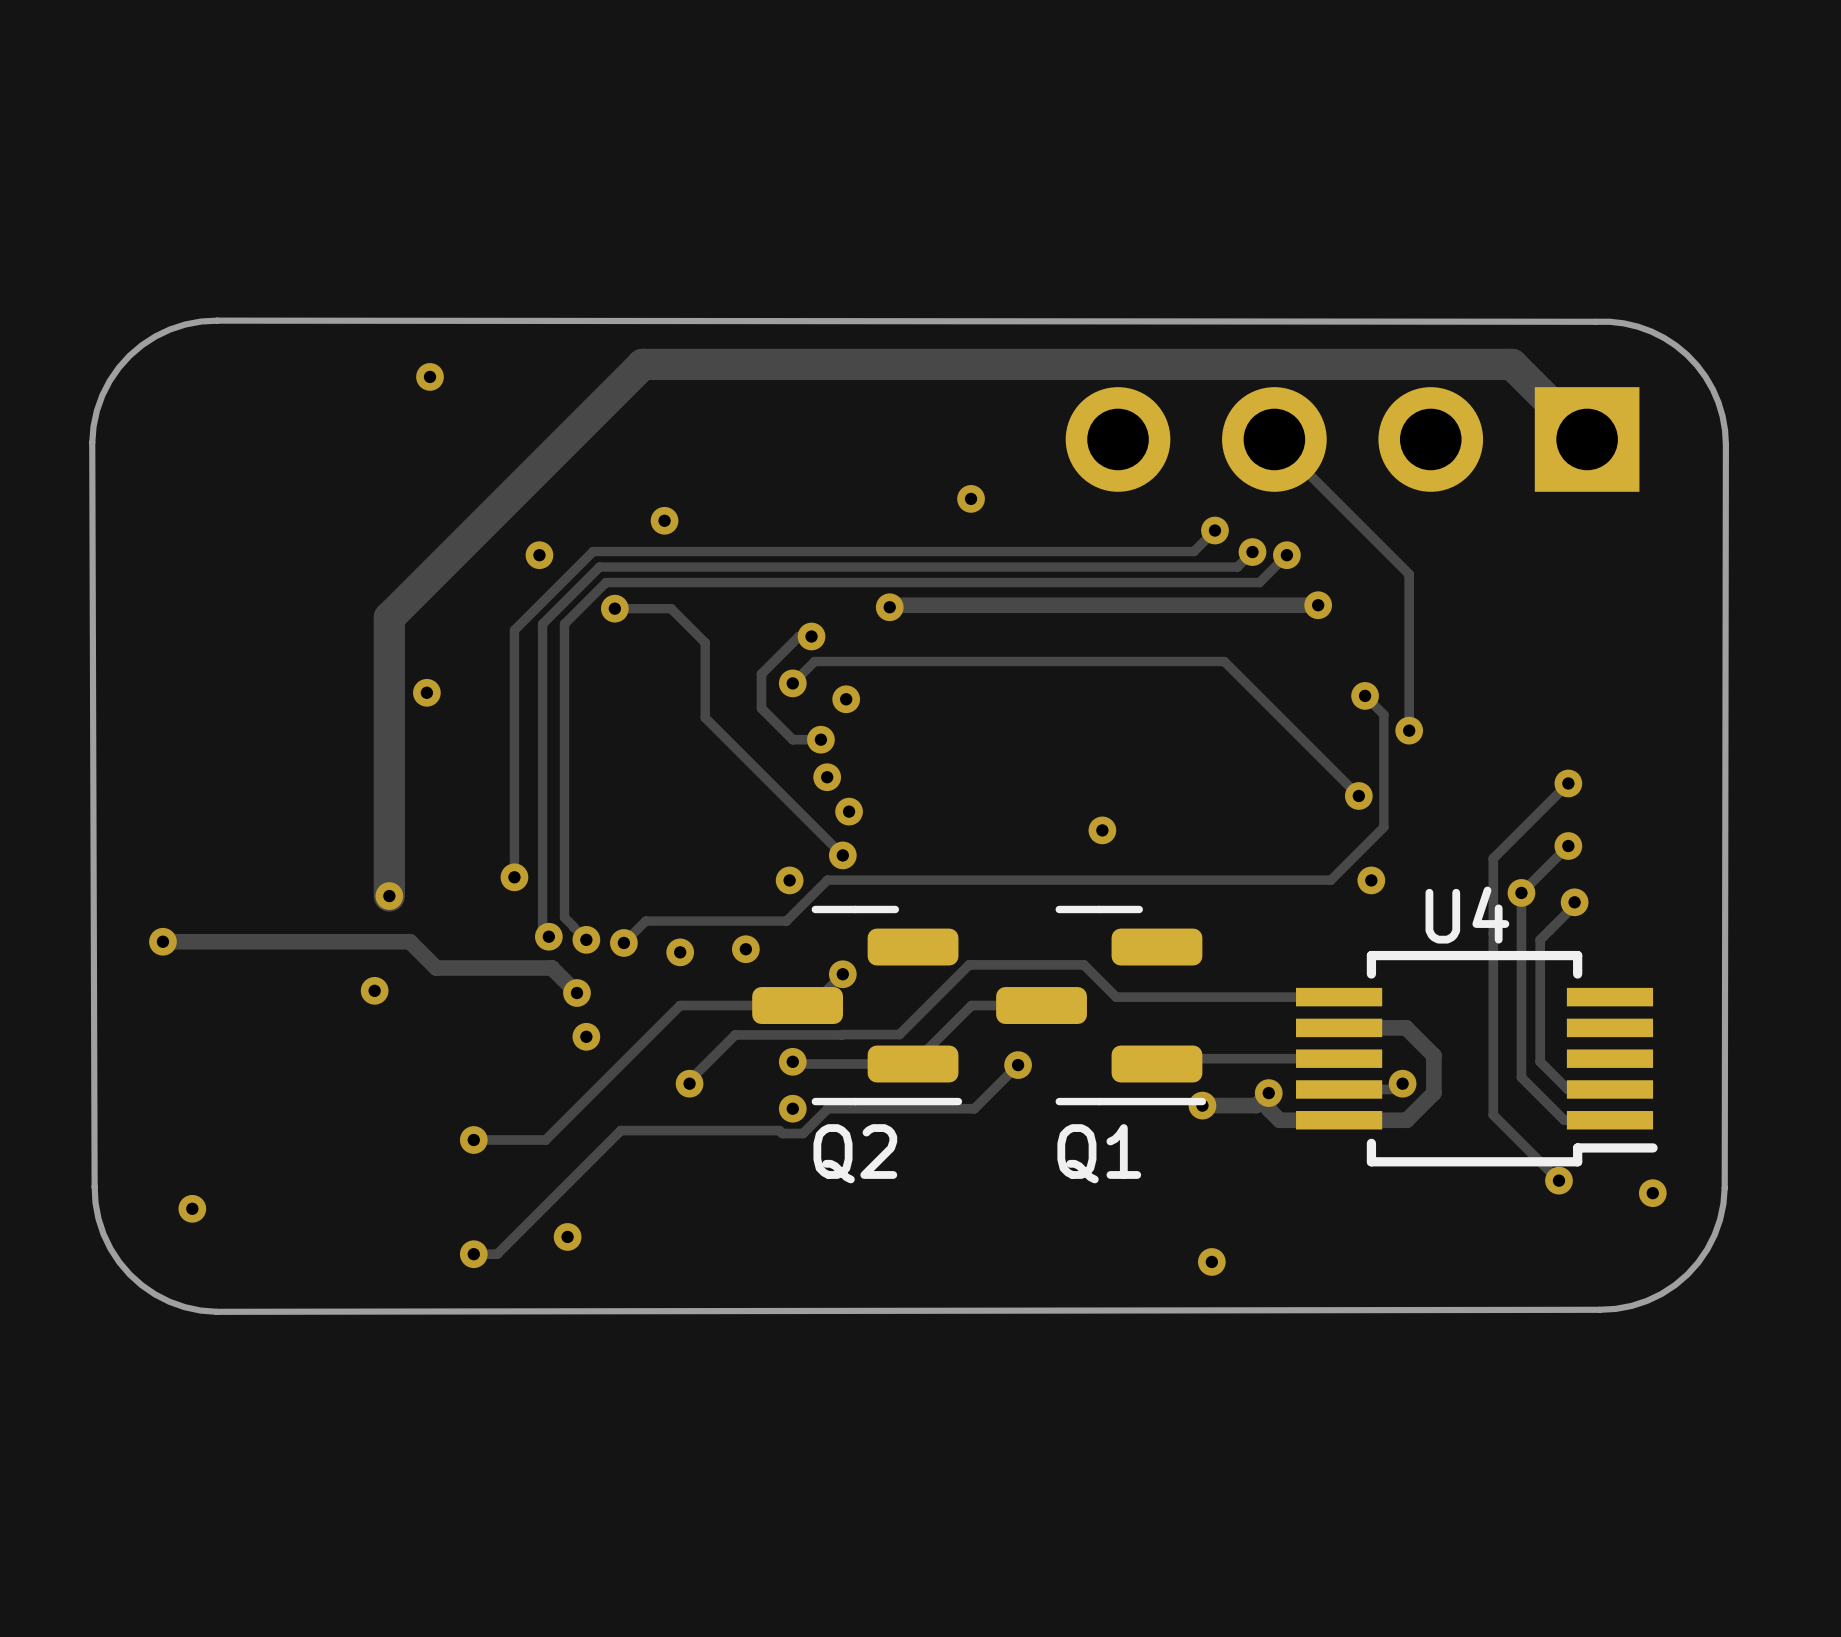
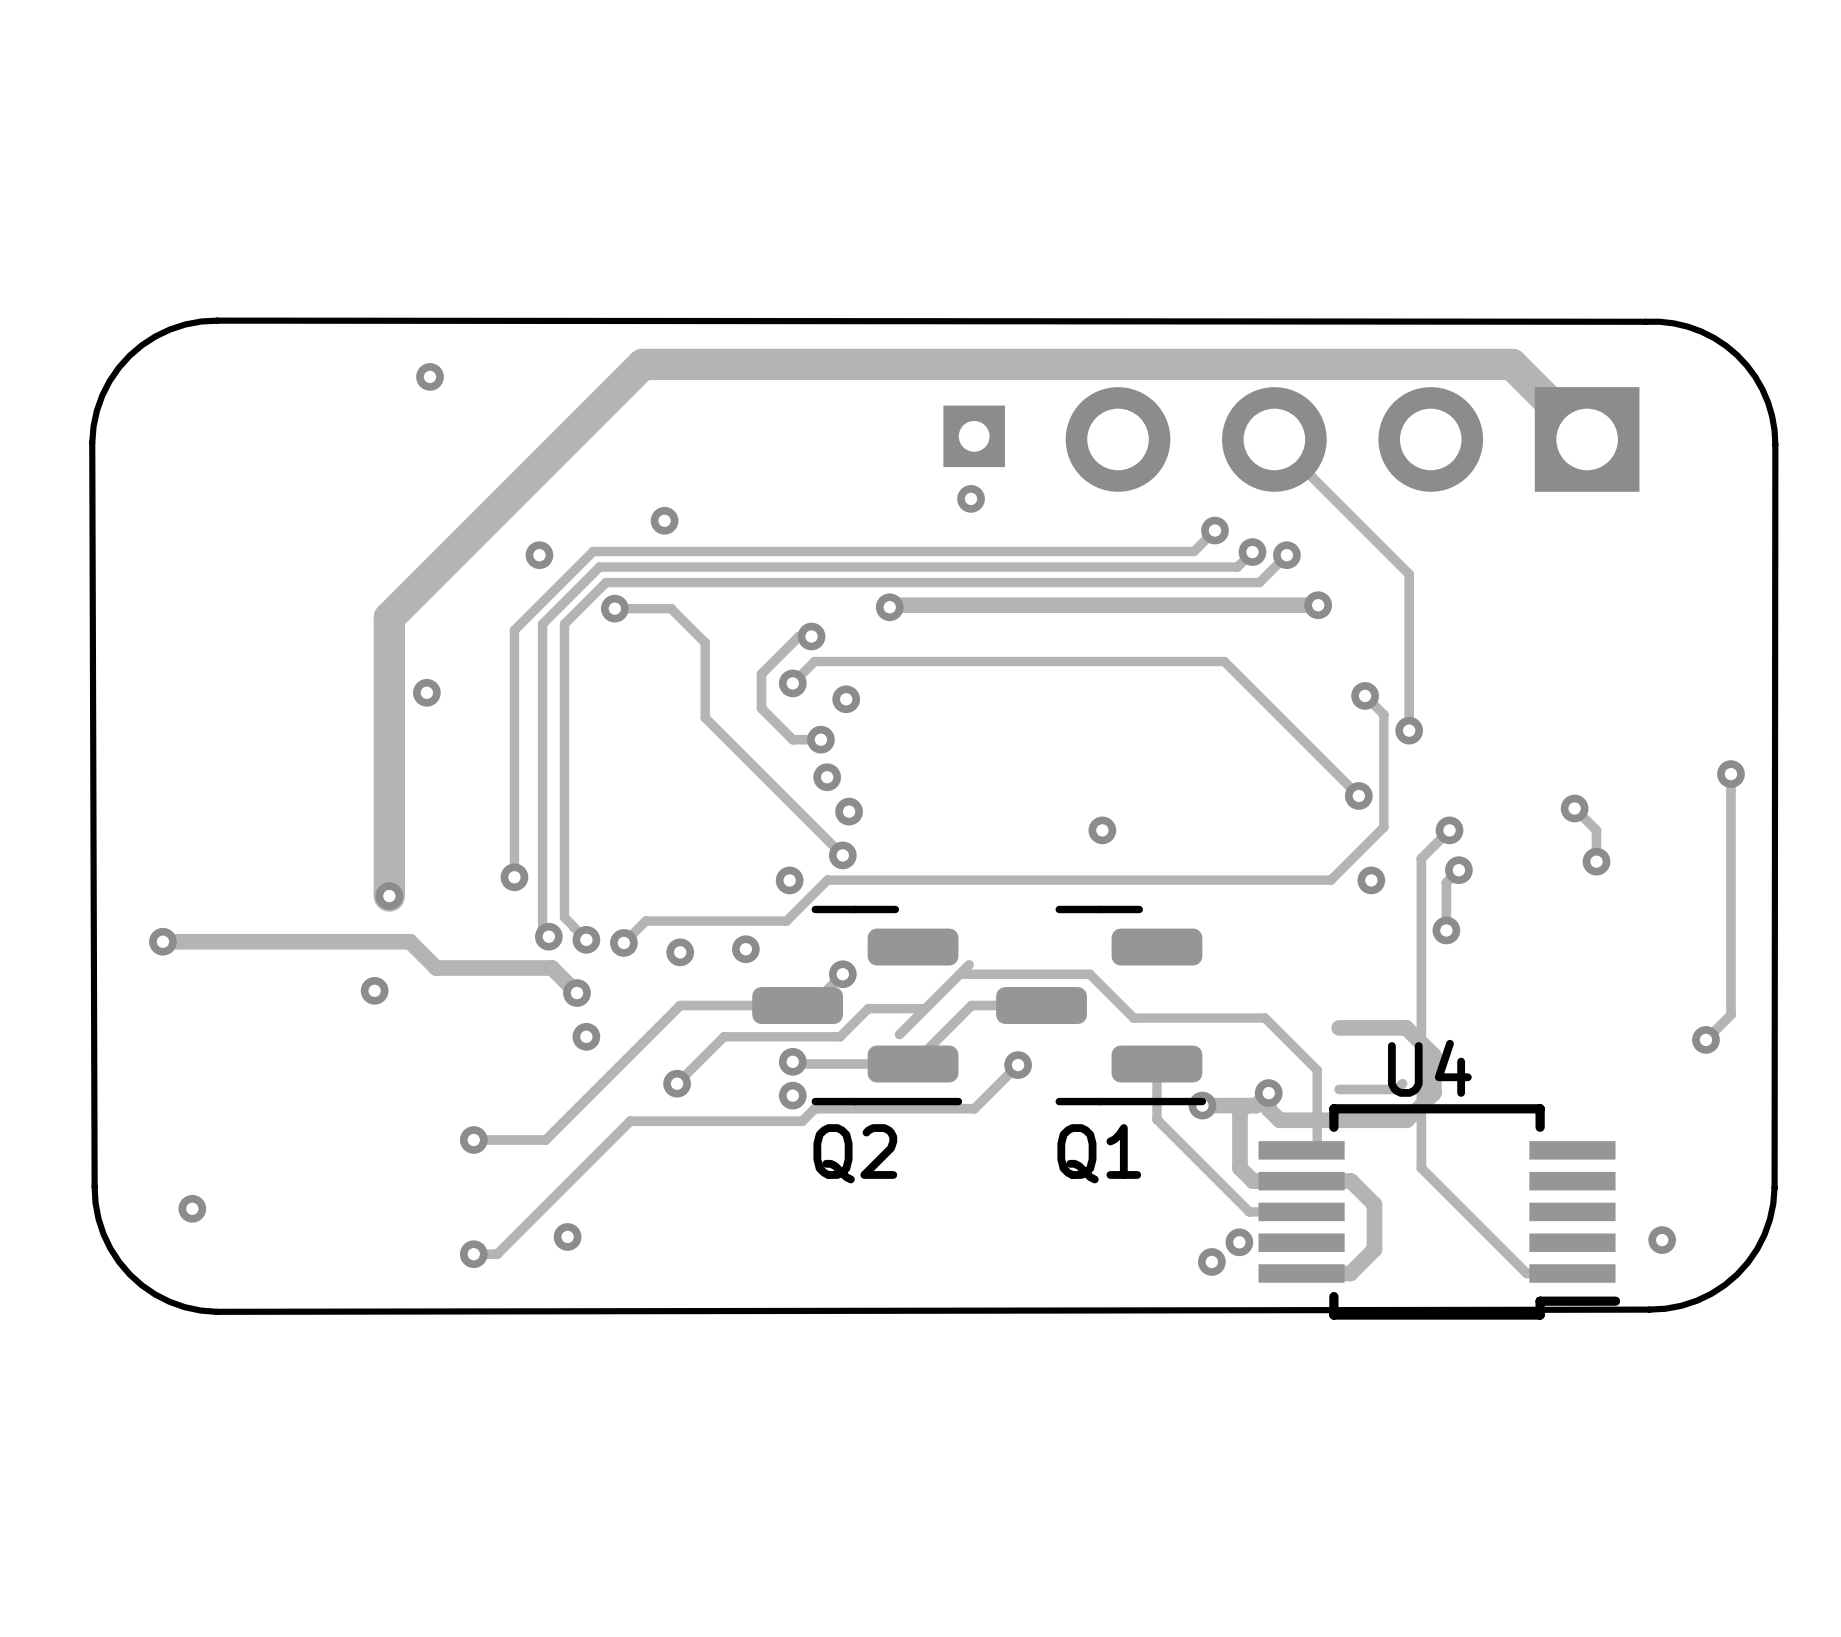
board edge: (1595, 321) (1609, 321) (1637, 326) (1651, 331) (1676, 345) (1697, 365) (1712, 389) (1722, 416) (1725, 430) (1724, 1187) (1723, 1203) (1714, 1234) (1698, 1262) (1675, 1285) (1646, 1300) (1631, 1305) (1599, 1309) (216, 1311) -> (1595, 321) (1673, 323) (1701, 331) (1714, 338) (1737, 355) (1755, 376) (1768, 402) (1774, 430) (1774, 1187) (1769, 1219) (1764, 1234) (1748, 1262) (1724, 1284) (1696, 1300) (1665, 1308) (1649, 1309) (216, 1311)
part: none -> (974, 436)
track: none -> (1730, 774) (1730, 1014) (1705, 1039)
via: none -> (1730, 774)
track: (1568, 783) (1493, 858) (1493, 1114) (1558, 1180) -> none
via position: (1568, 783) -> (1574, 808)
track: none -> (1574, 808) (1596, 830) (1596, 861)
track: none -> (1449, 830) (1421, 858) (1421, 1168) (1526, 1273) (1588, 1273)
via: none -> (1449, 830)
track: (1568, 846) (1521, 892) (1521, 1077) (1564, 1120) (1609, 1120) -> none
via: (1568, 846) -> none
via: none -> (1596, 861)
track: none -> (1458, 870) (1446, 882) (1446, 930)
via: none -> (1458, 870)
via: (1521, 892) -> none
track: (1574, 902) (1574, 905) (1540, 939) (1540, 1061) (1567, 1089) (1609, 1089) -> none
via: (1574, 902) -> none
via: none -> (1446, 930)
track: (969, 964) (1083, 964) (1116, 997) (1339, 997) -> none
track: none -> (959, 974) (1089, 974) (1133, 1018) (1265, 1018) (1317, 1070) (1317, 1150)
track: none -> (925, 1008) (868, 1008) (840, 1036) (723, 1036) (677, 1083)
track: (842, 1034) (735, 1034) (689, 1080) (689, 1083) -> none
track: (899, 1034) (842, 1034) -> none
via: none -> (1705, 1039)
track: (1339, 1058) (1162, 1058) (1156, 1064) -> (1317, 1211) (1249, 1211) (1156, 1119) (1156, 1064)
U4 position: (1476, 1058) -> (1439, 1211)
via position: (689, 1083) -> (677, 1083)
via: (1402, 1083) -> none
via position: (792, 1108) -> (792, 1095)
track: (827, 1108) (803, 1133) (782, 1133) (779, 1130) (620, 1130) -> (827, 1108) (814, 1108) (802, 1121) (630, 1121) (620, 1130)
track: none -> (1243, 1108) (1239, 1111) (1239, 1168) (1252, 1181) (1351, 1181) (1374, 1204) (1374, 1249) (1350, 1273) (1317, 1273)
via: (1558, 1180) -> none
via position: (1652, 1193) -> (1662, 1240)
via: none -> (1239, 1242)

